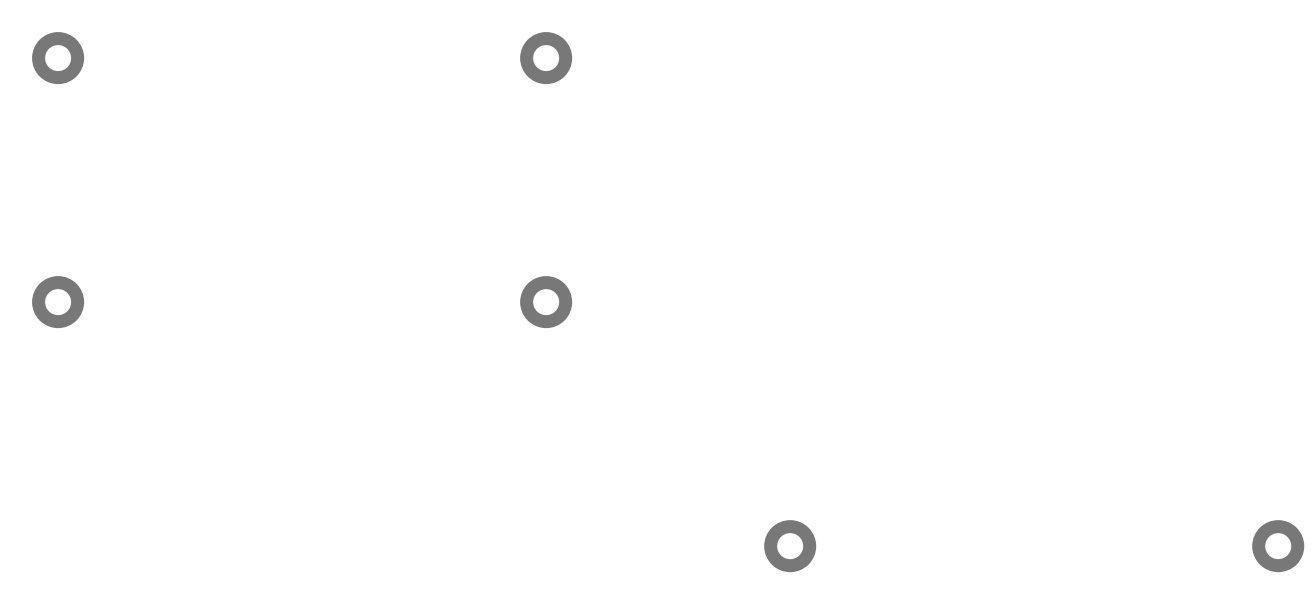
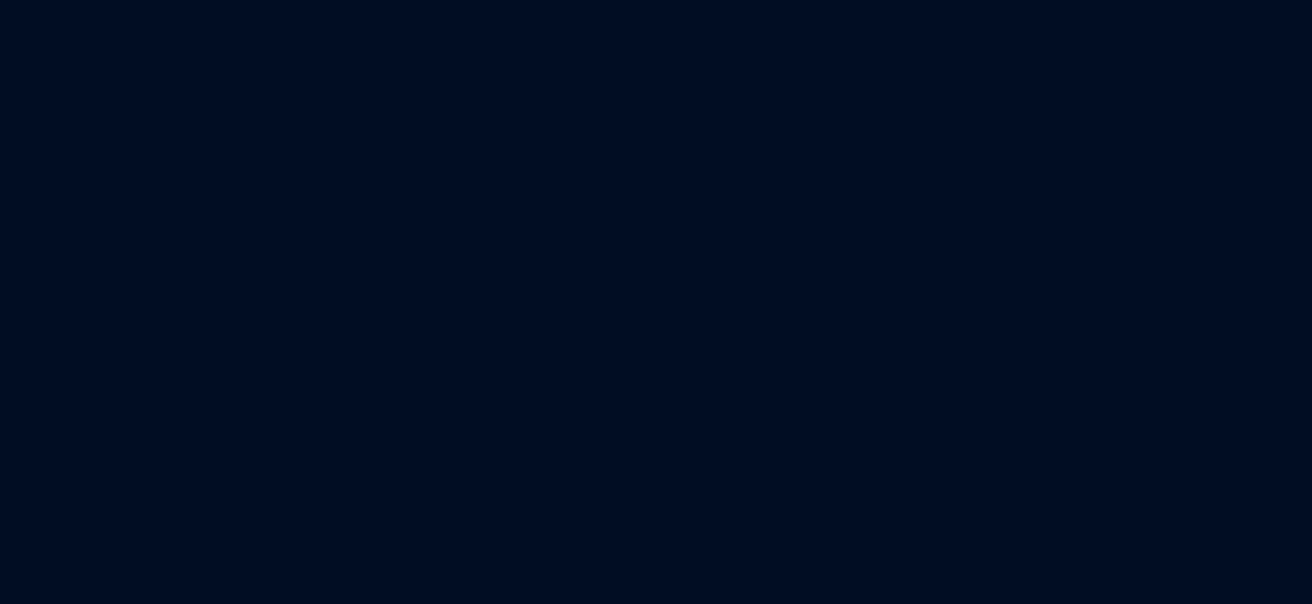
via: (58, 58) -> none
via: (546, 58) -> none
via: (58, 302) -> none
via: (546, 302) -> none
via: (790, 546) -> none
via: (1278, 546) -> none

